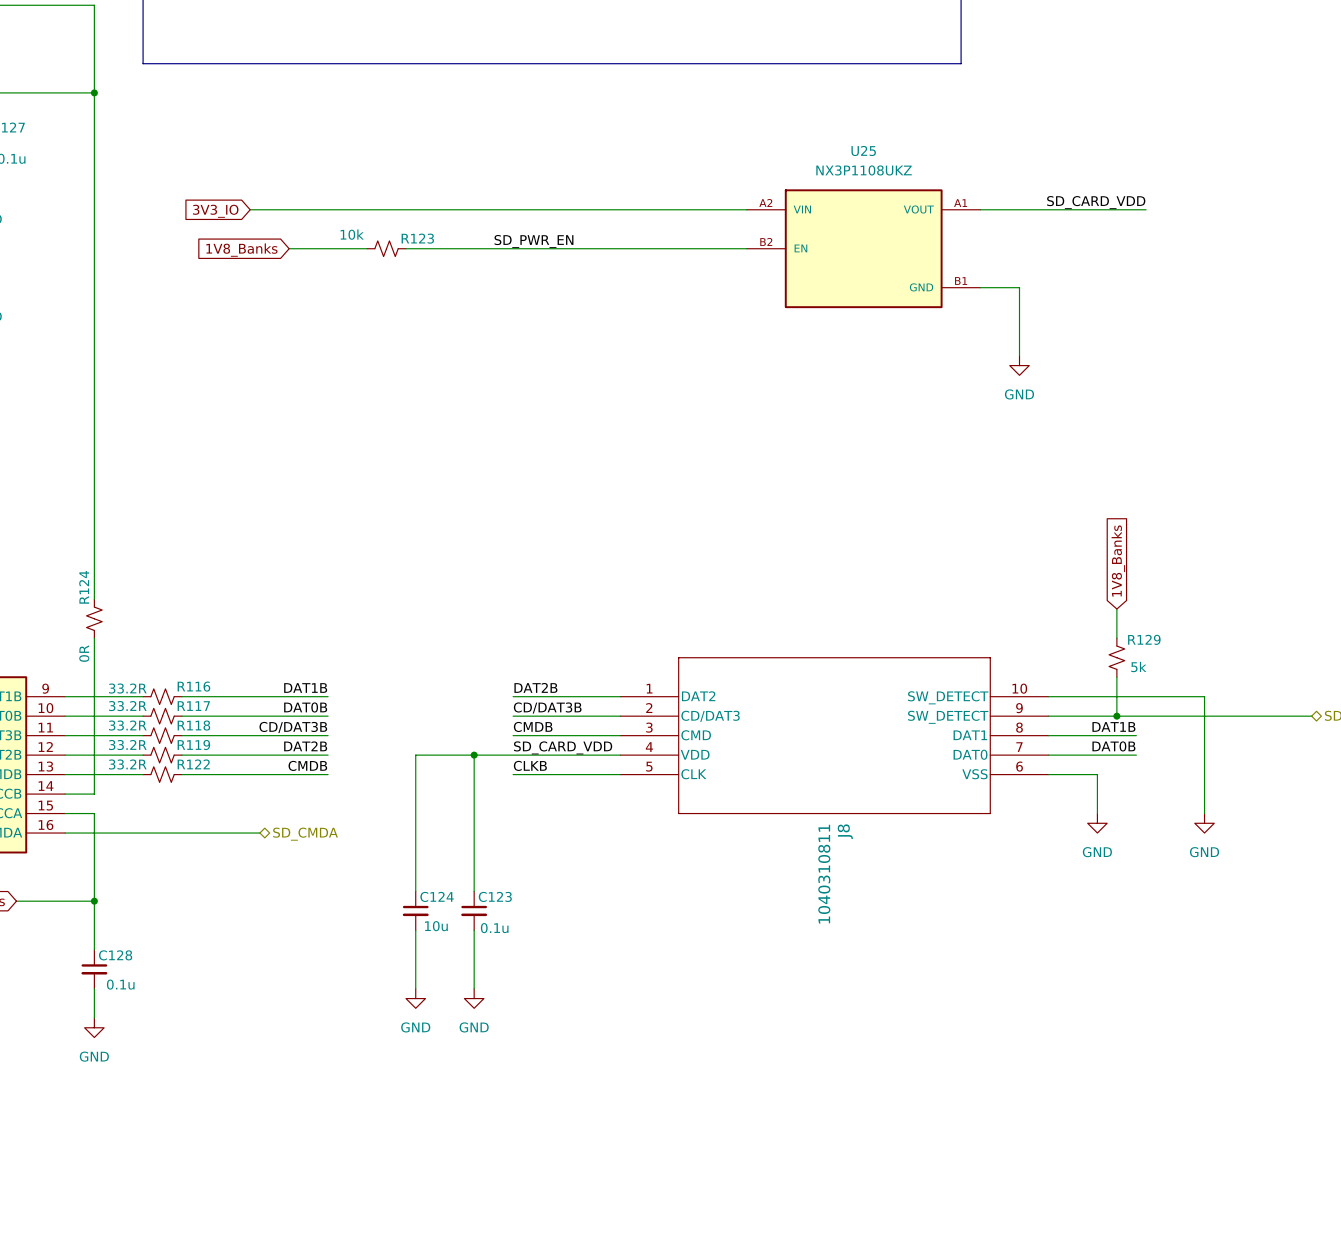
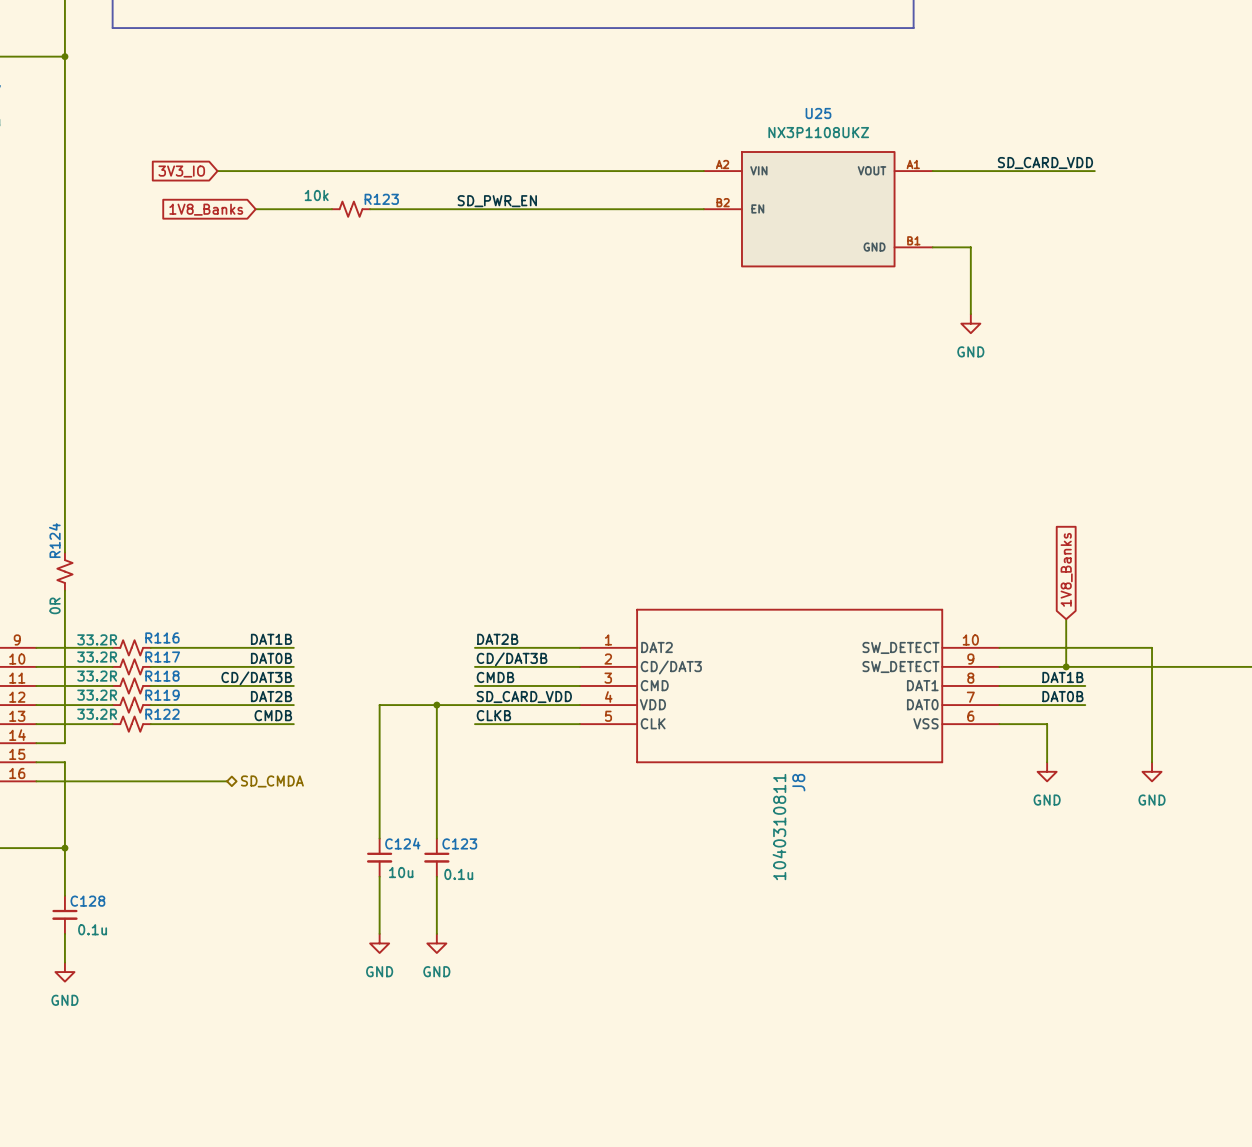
global label position: 1V8_Banks (1118, 561) -> 1V8_Banks (1066, 569)
wire: (1116, 609) (1116, 638) -> none
R129: 5k (1116, 657) -> none

